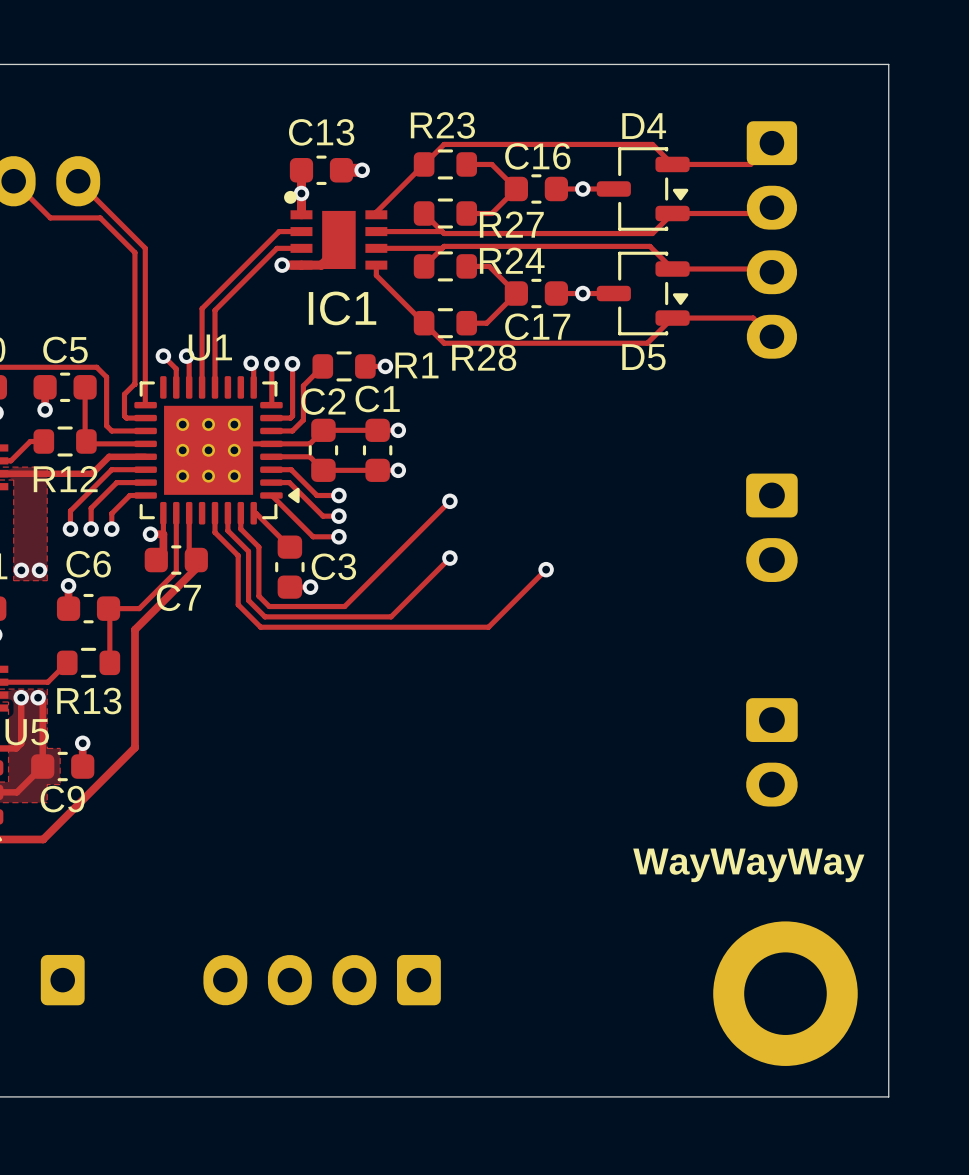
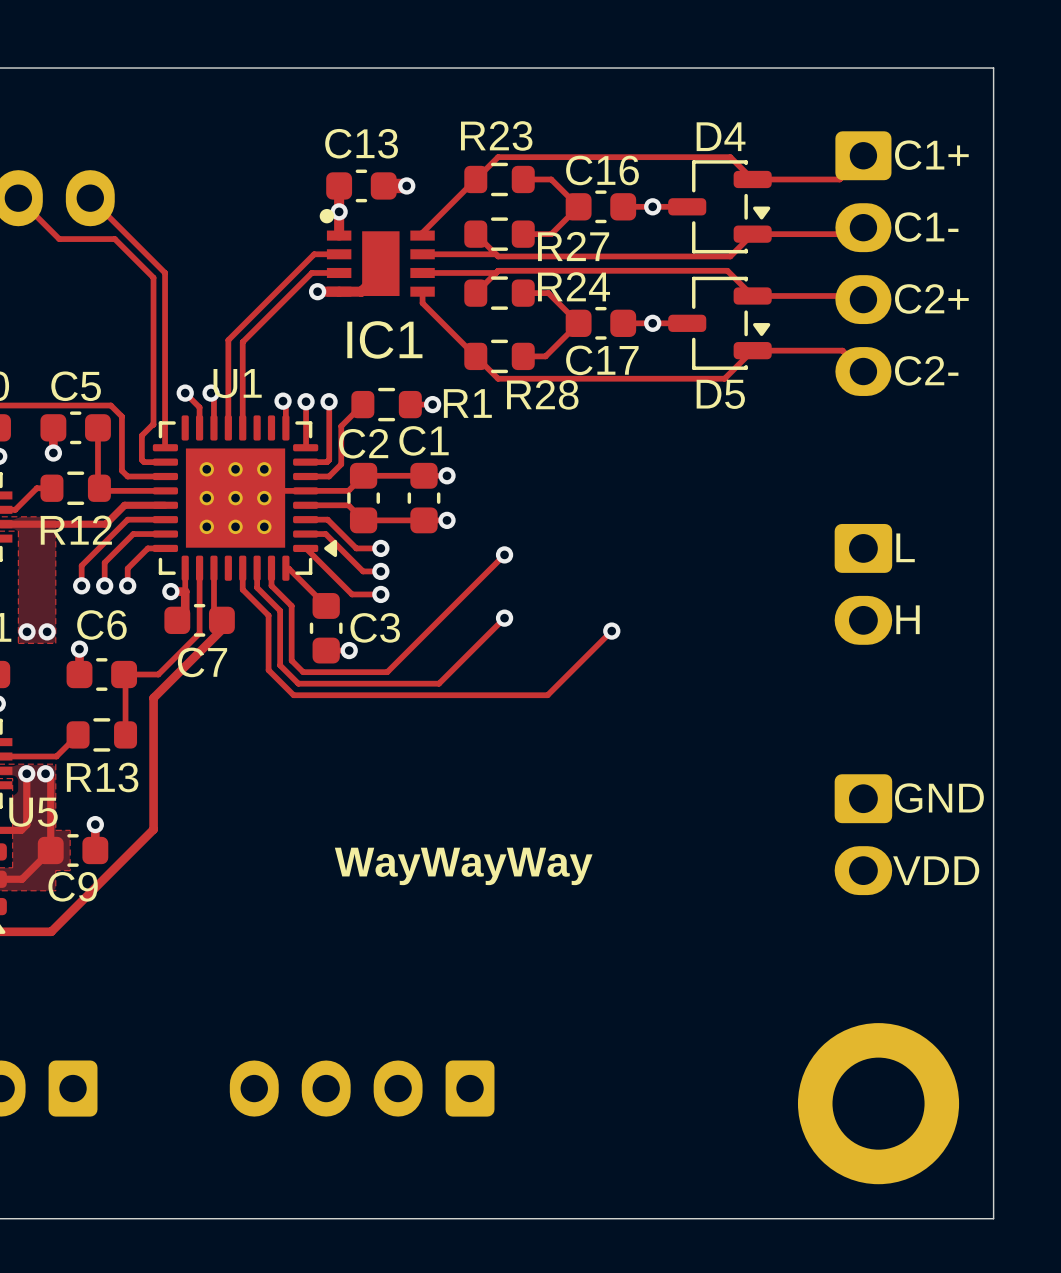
text: none -> C1+ (931, 155)
text: none -> C1- (926, 227)
text: none -> C2+ (931, 298)
text: none -> C2- (926, 370)
text: none -> L (905, 547)
text: none -> H (908, 619)
text: none -> GND (939, 798)
text: none -> VDD (936, 870)
text position: WayWayWay (748, 865) -> WayWayWay (463, 866)

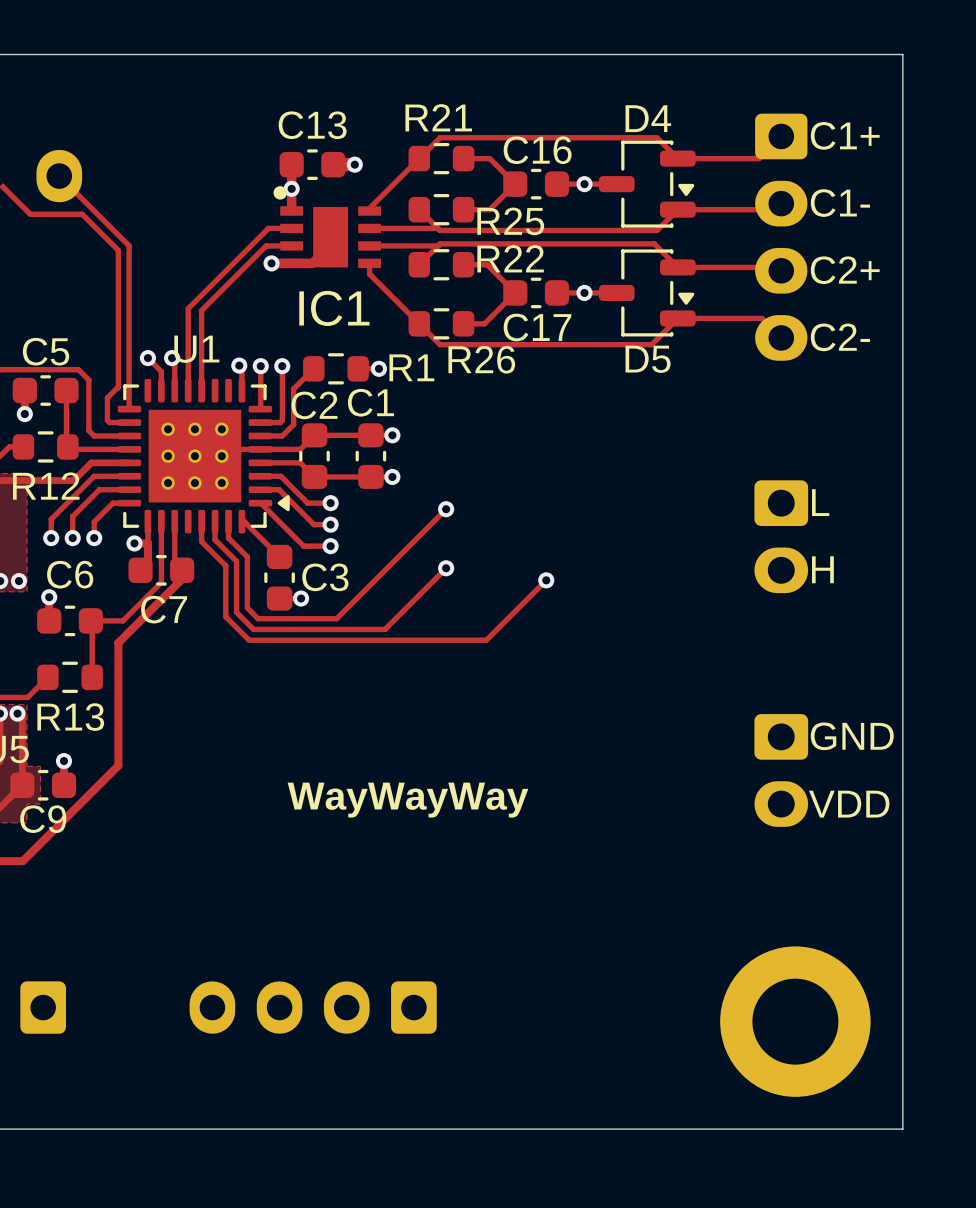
R23 name: R23 (496, 135) -> R21 (438, 117)
R27 name: R27 (573, 246) -> R25 (510, 221)
R24 name: R24 (574, 286) -> R22 (510, 258)
R28 name: R28 (542, 394) -> R26 (481, 359)

